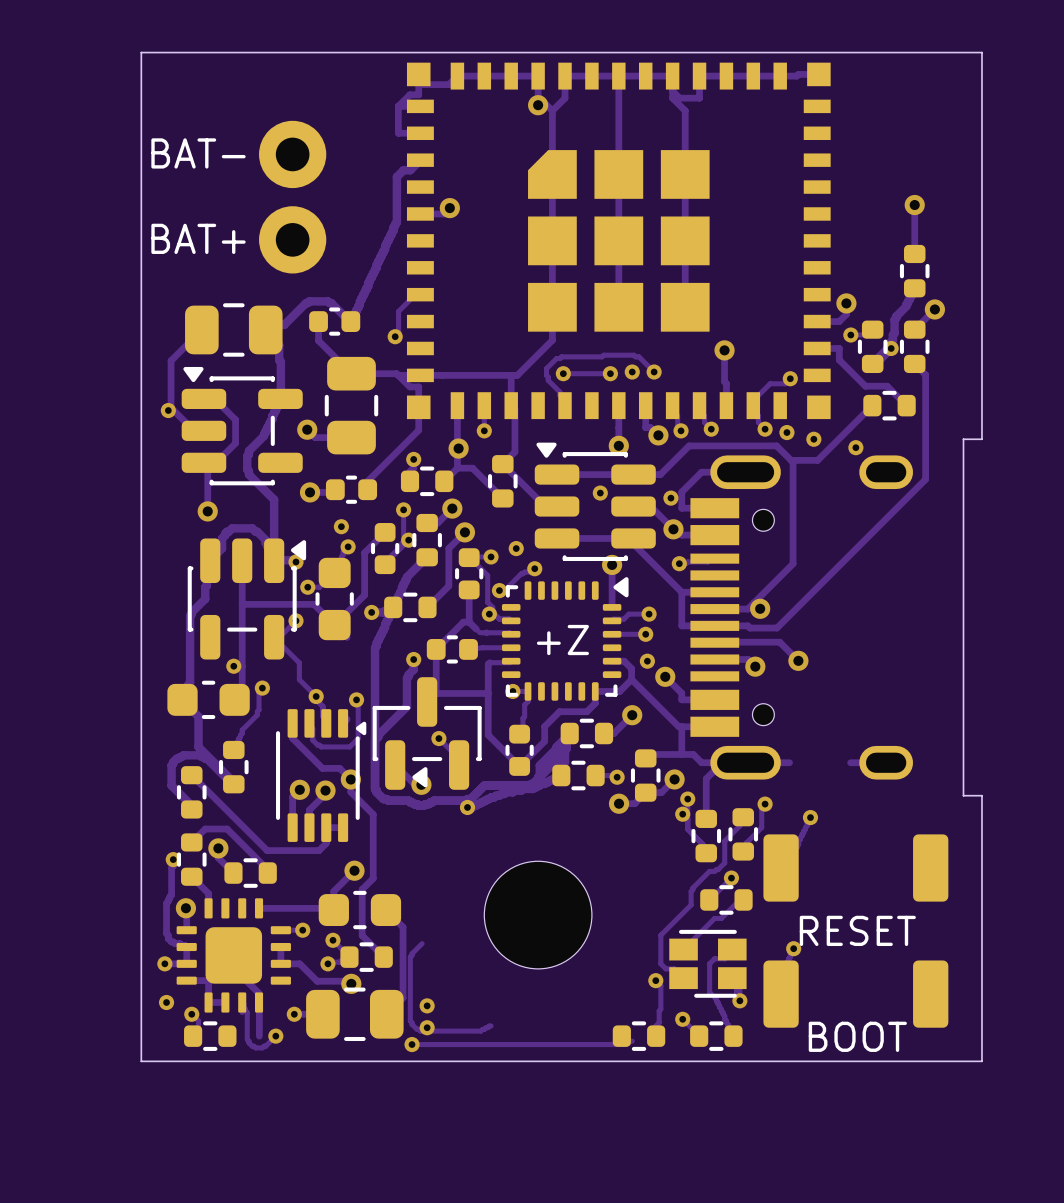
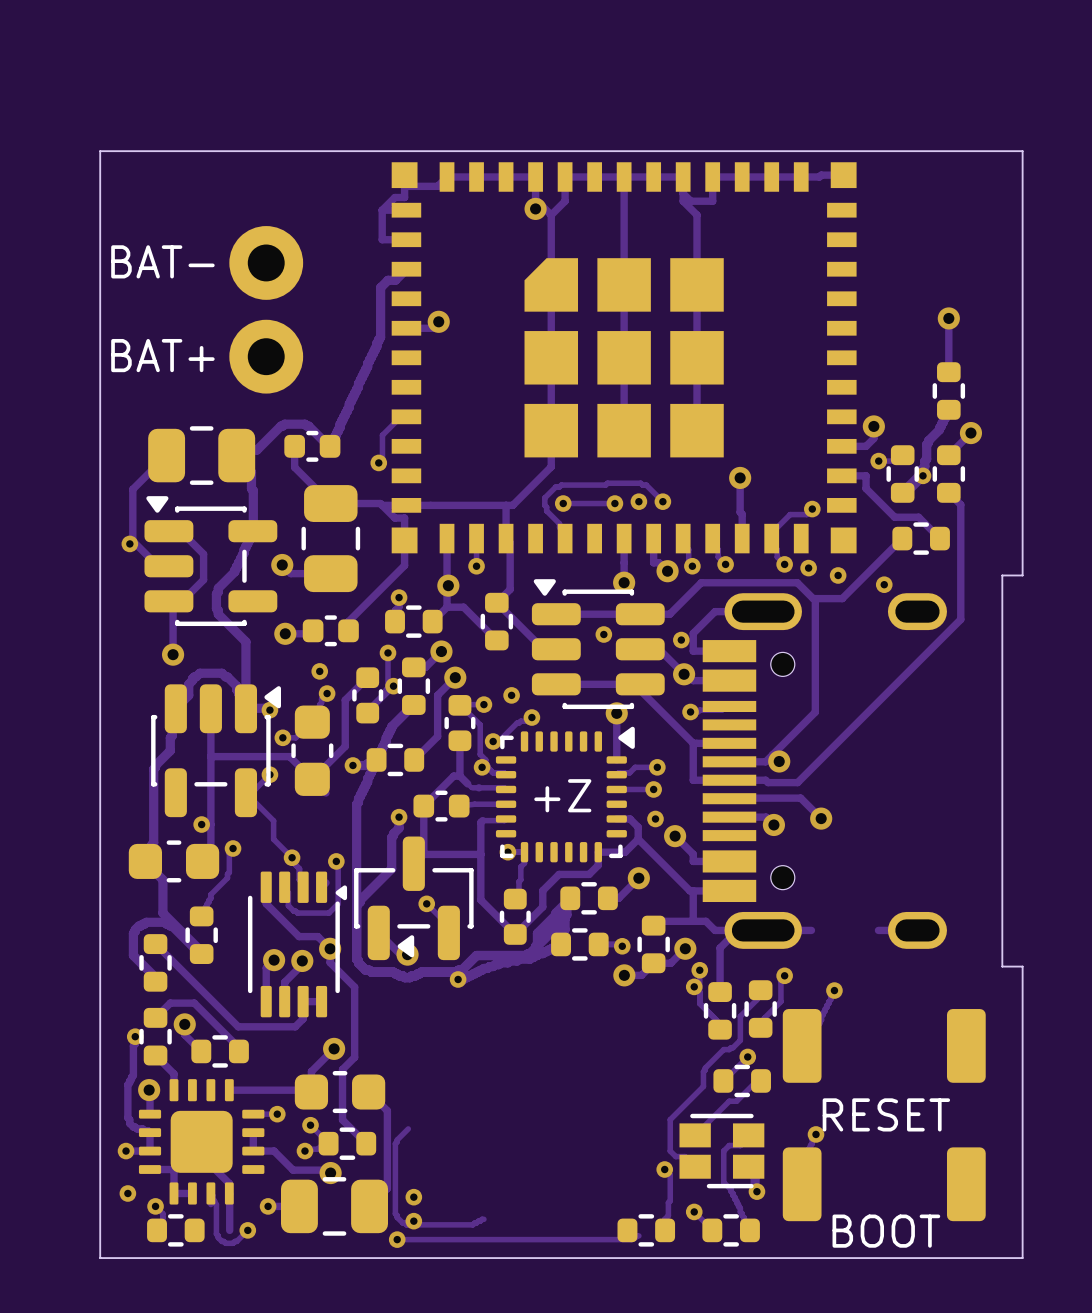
part: (538, 915) -> none

